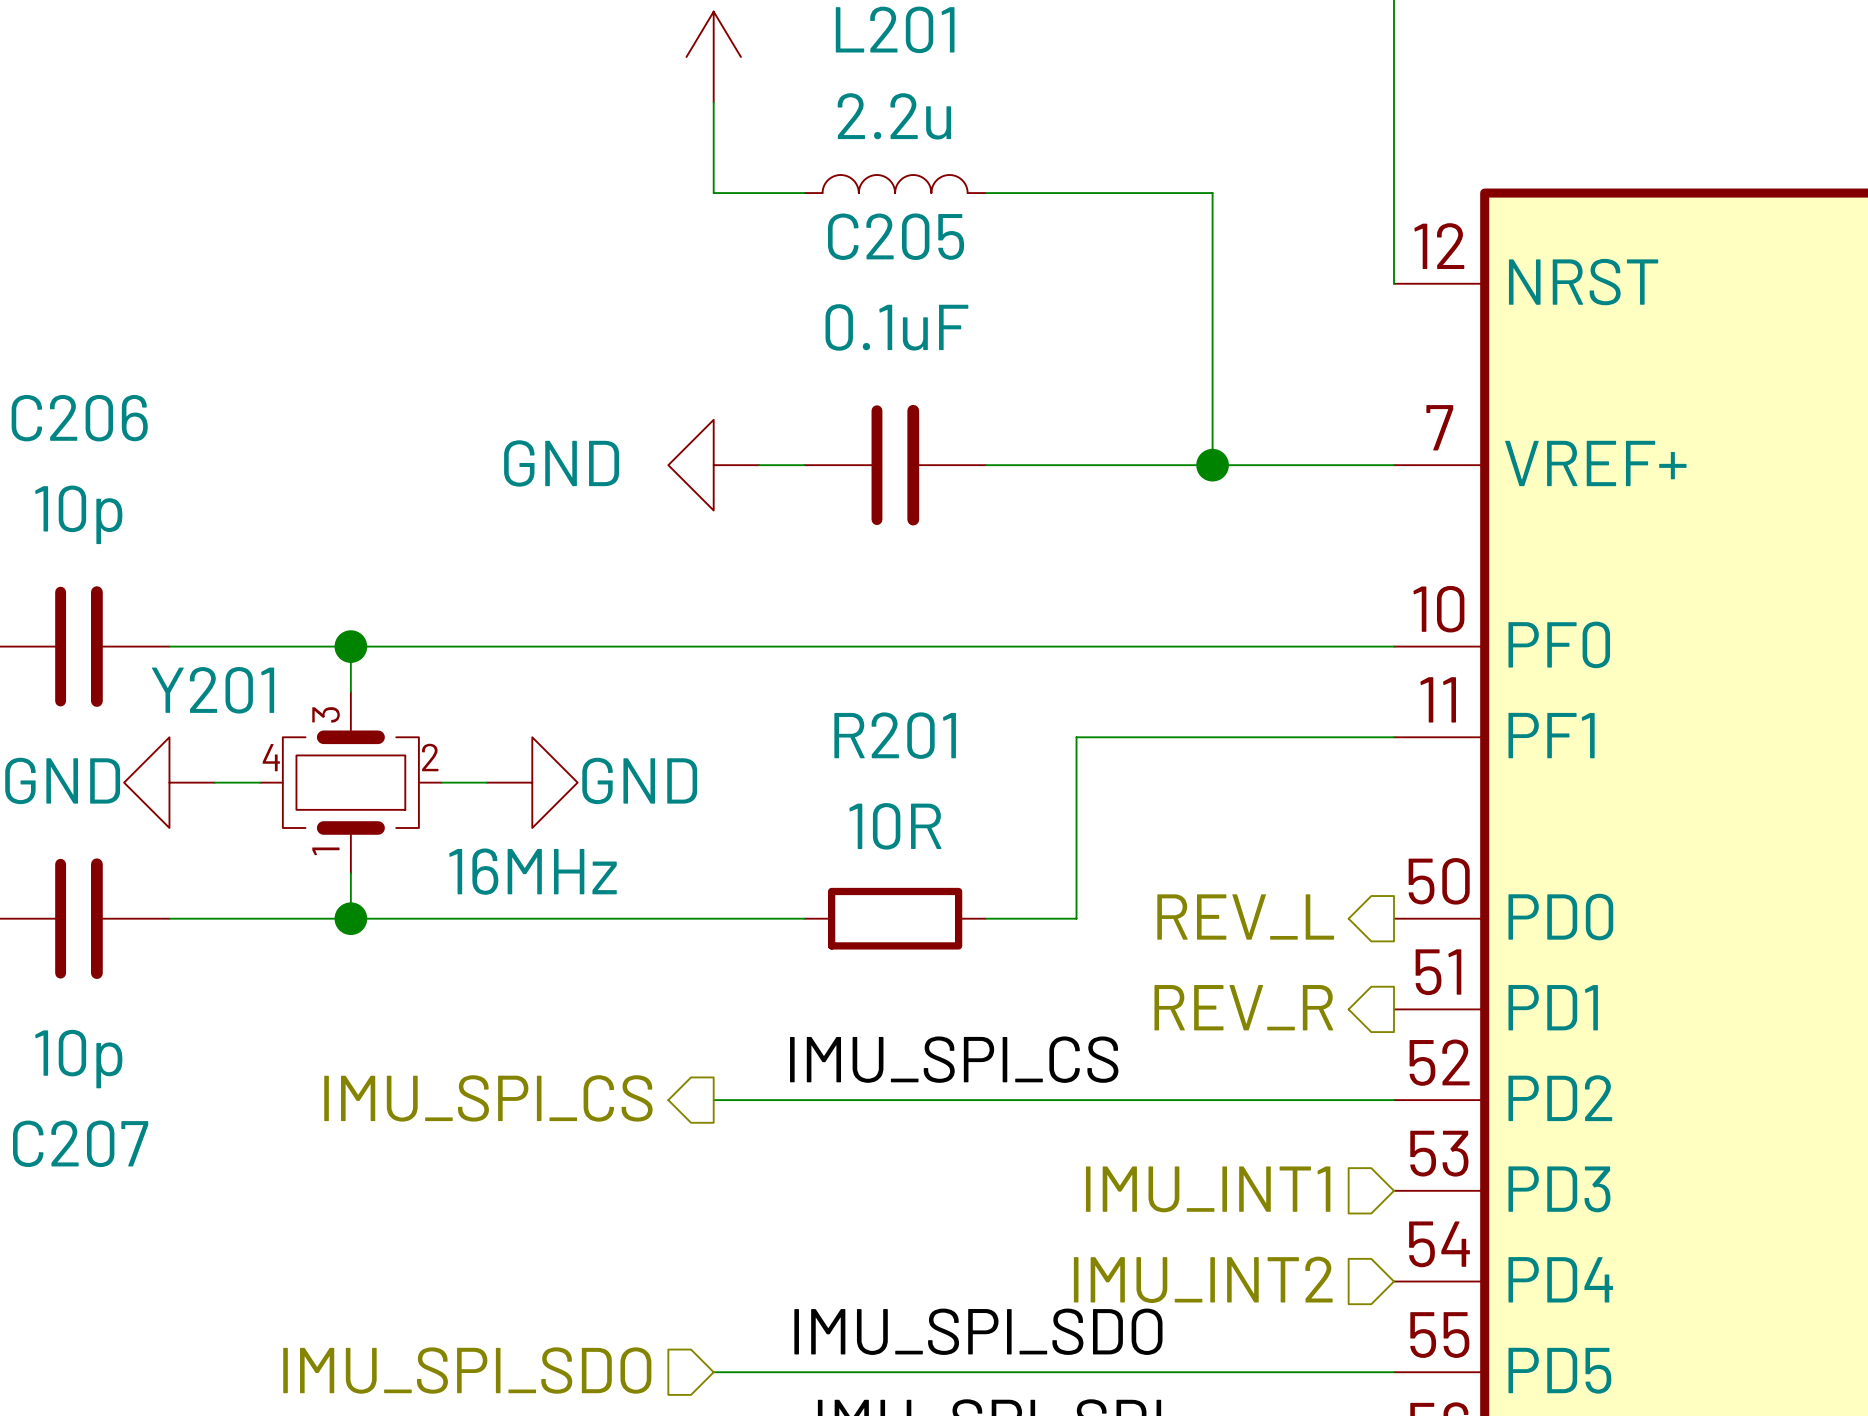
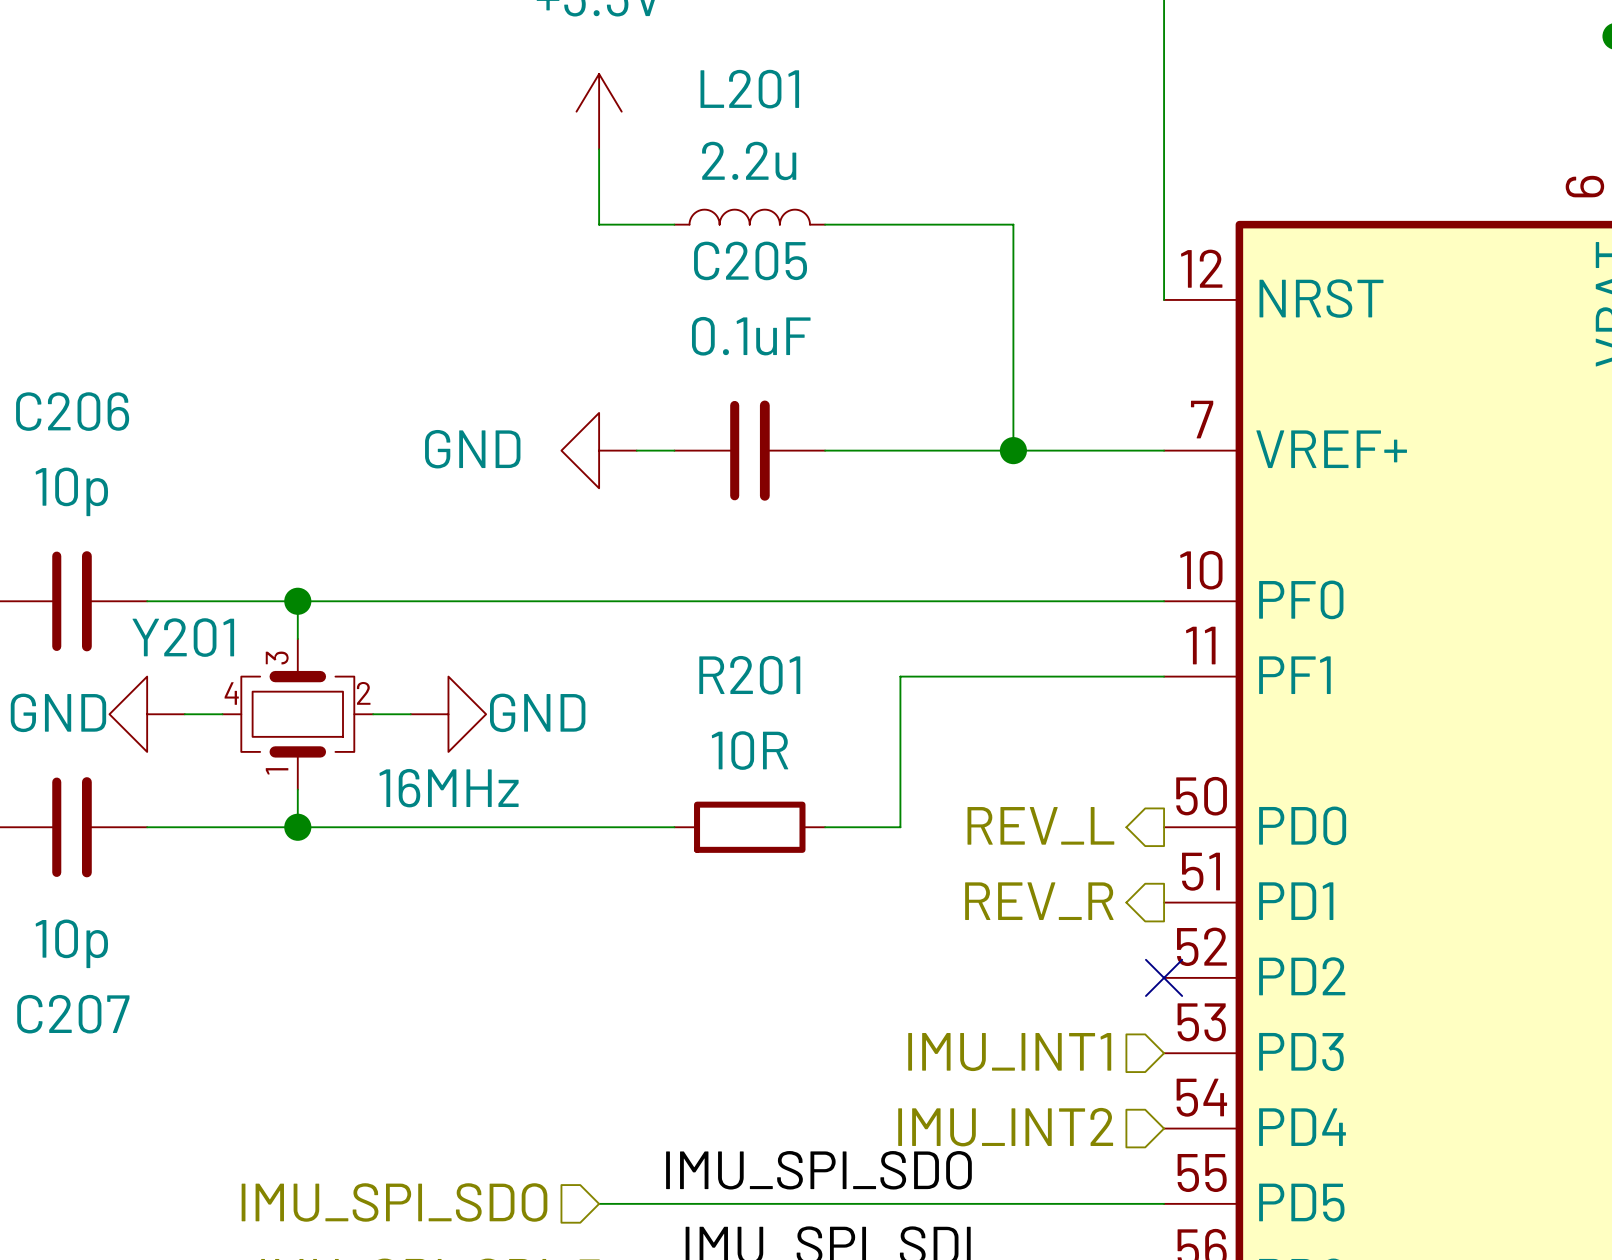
label: IMU_SPI_CS (954, 1059) -> none
hierarchical label: IMU_SPI_CS (488, 1098) -> none
wire: (713, 1100) (1393, 1100) -> none
no-connect mark: none -> (1164, 977)

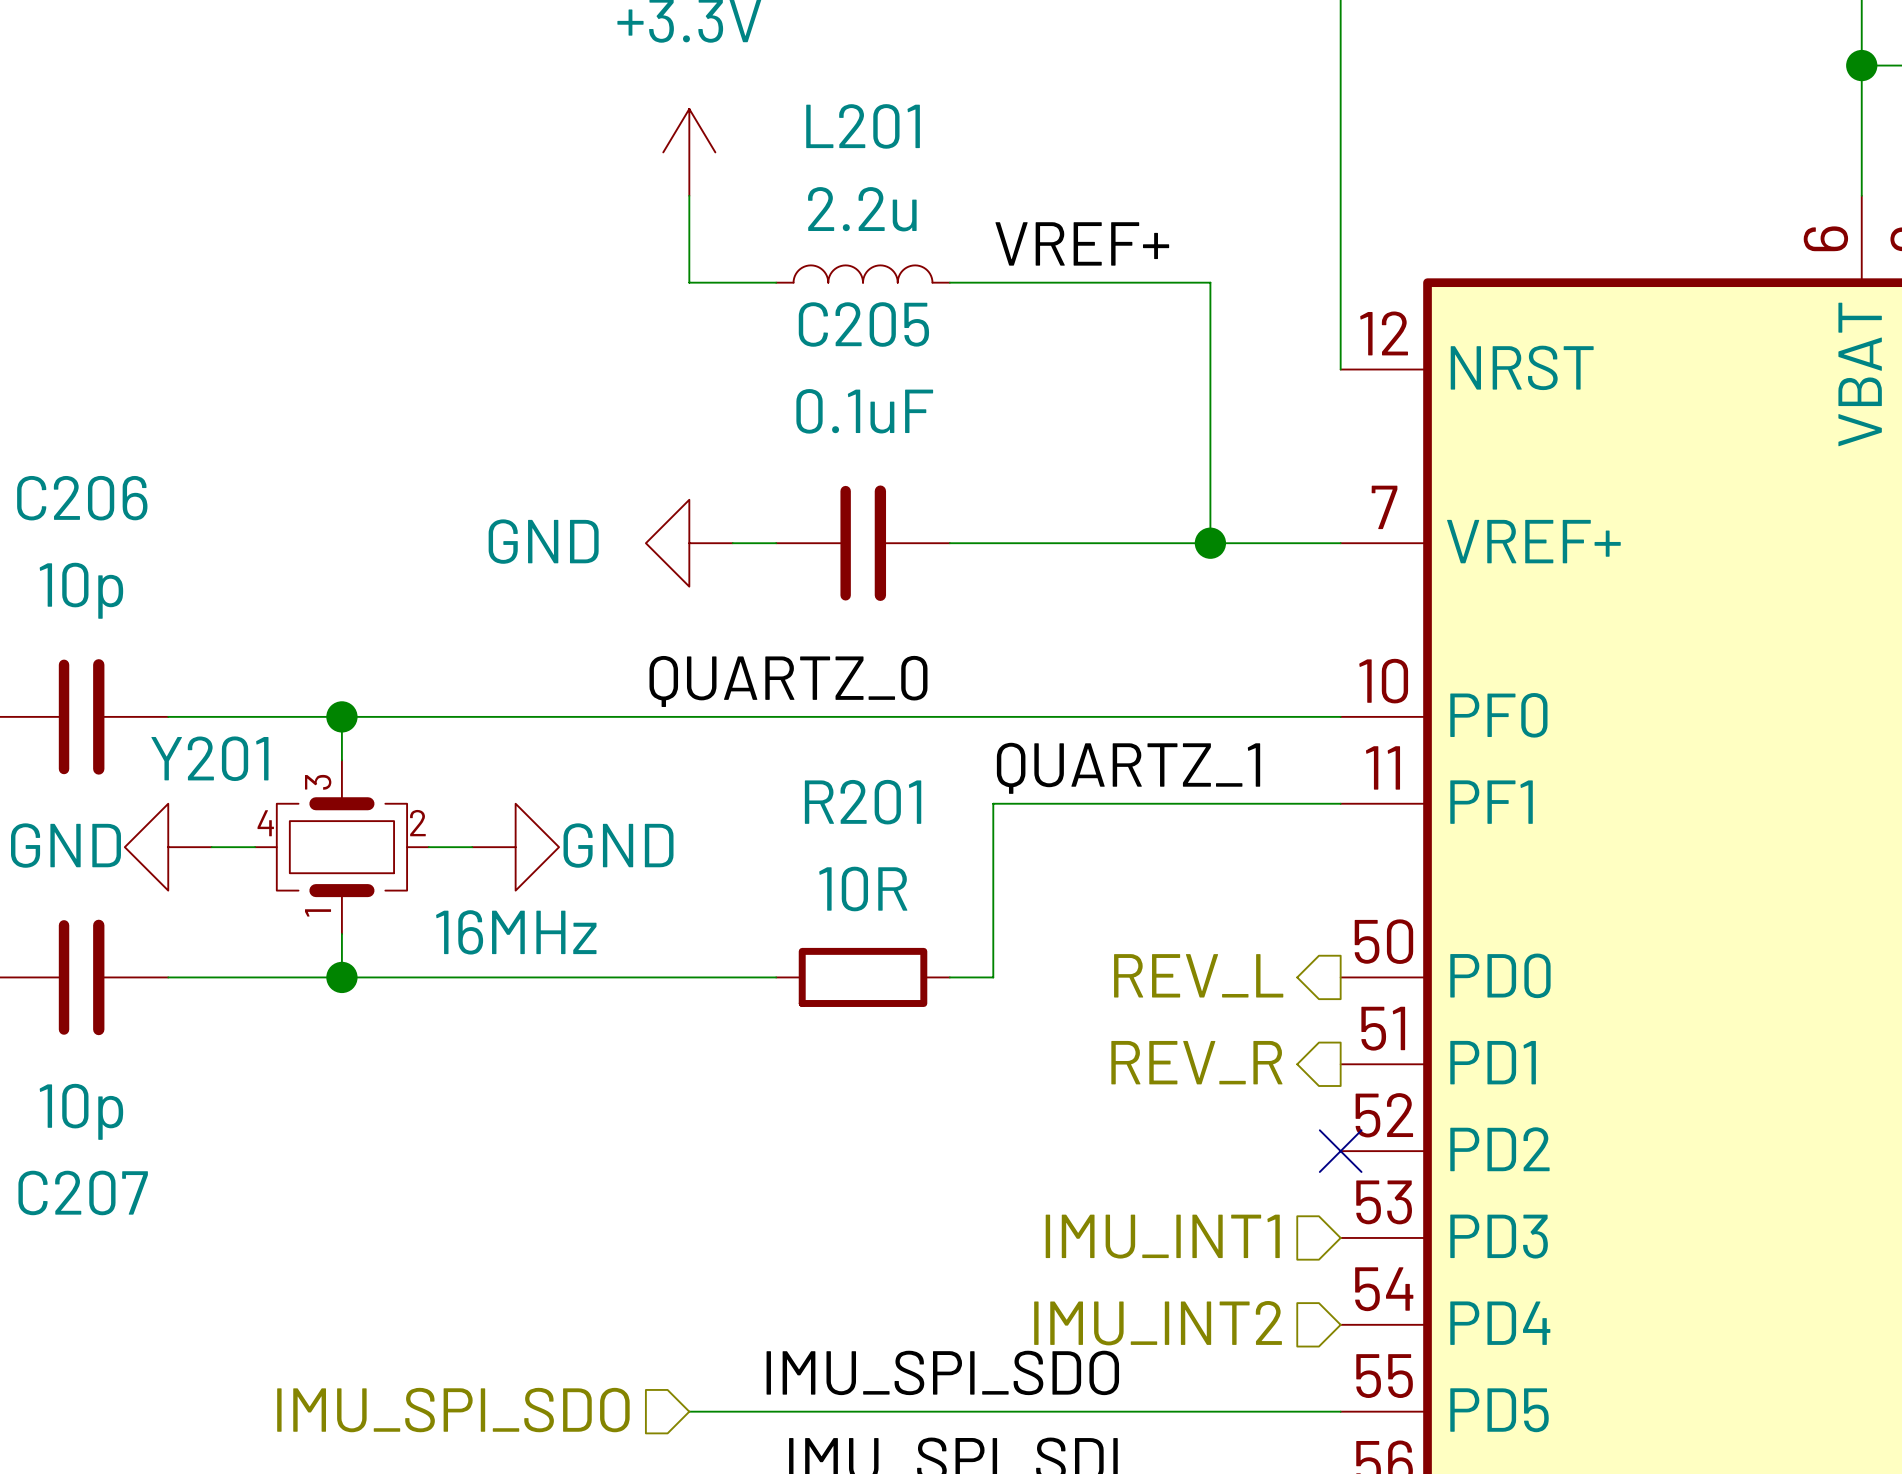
label: none -> VREF+ (1082, 243)
wire: (1013, 224) (1013, 450) -> (1166, 282) (1210, 282) (1210, 543)
junction position: (1013, 450) -> (1210, 543)
label: none -> QUARTZ_0 (788, 681)
label: none -> QUARTZ_1 (1128, 768)
wire: (900, 676) (900, 827) (862, 827) -> (1036, 803) (993, 803) (993, 977)

